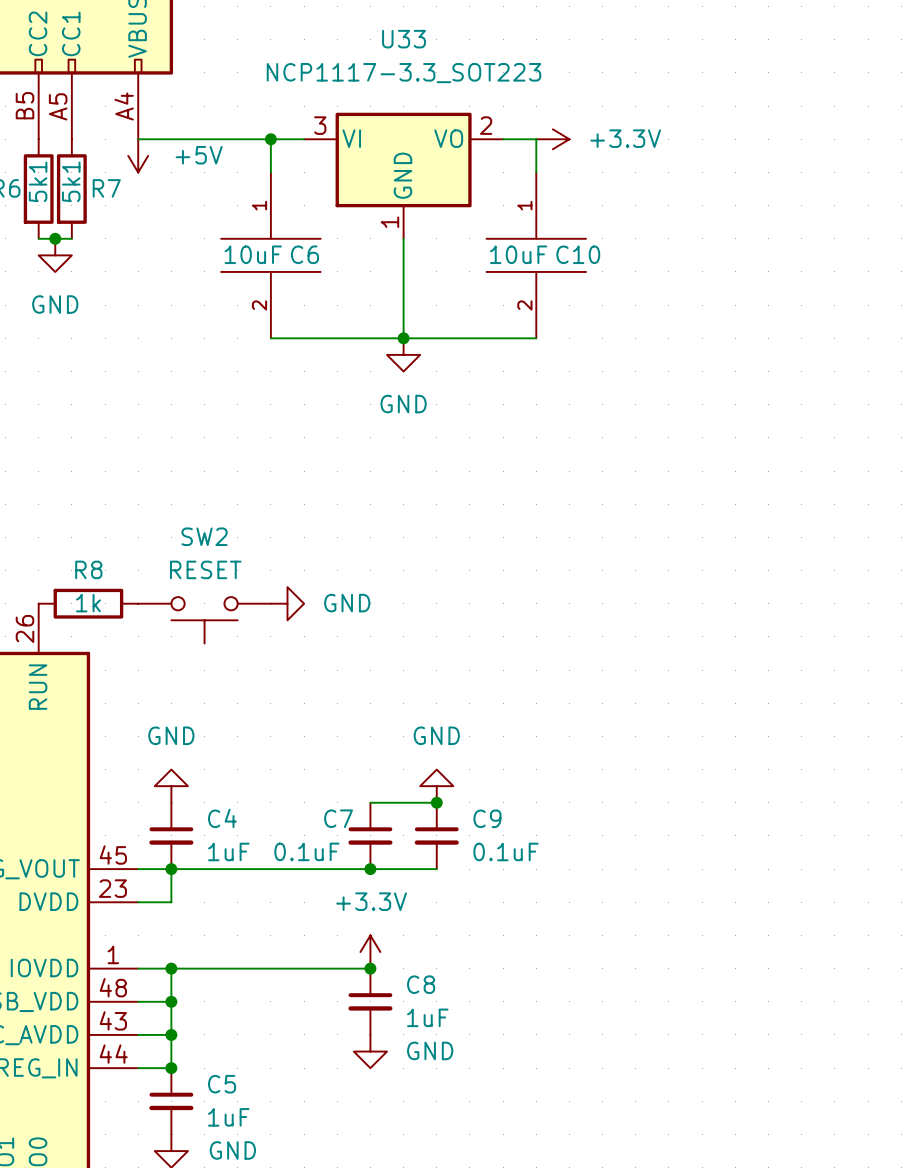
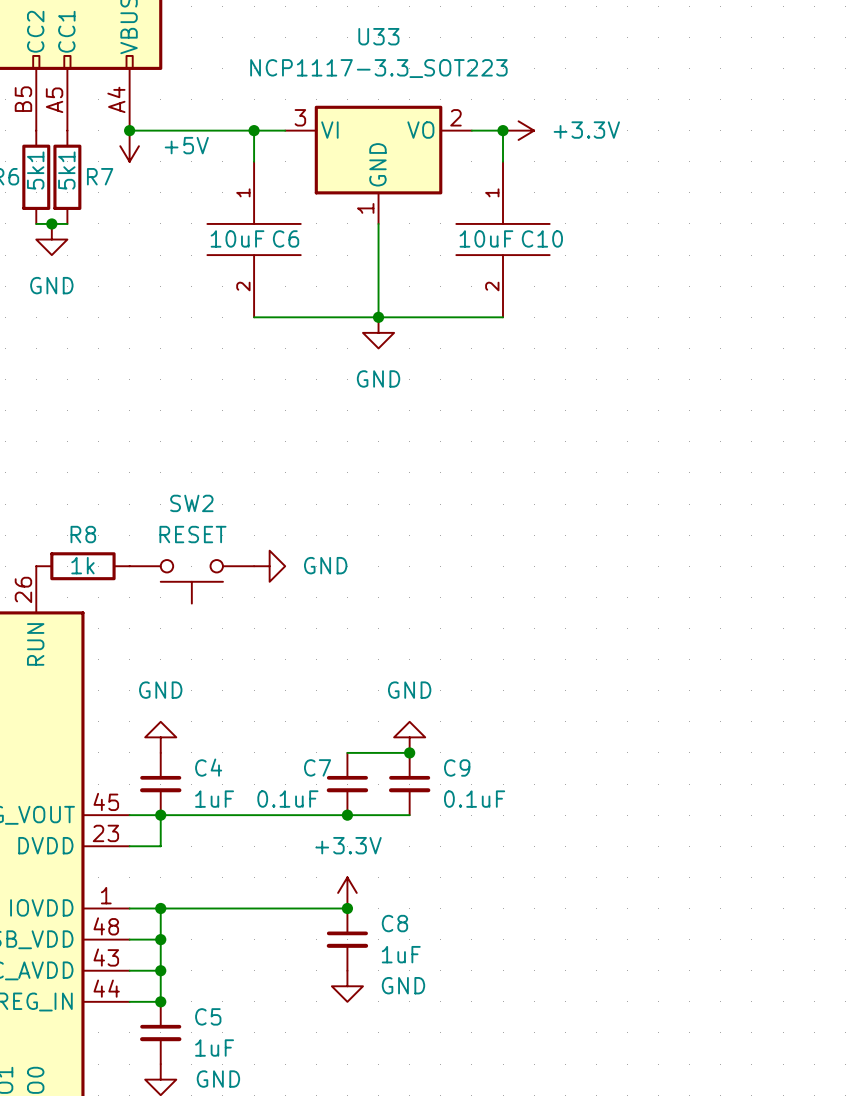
junction: none -> (129, 130)
junction: none -> (503, 130)

